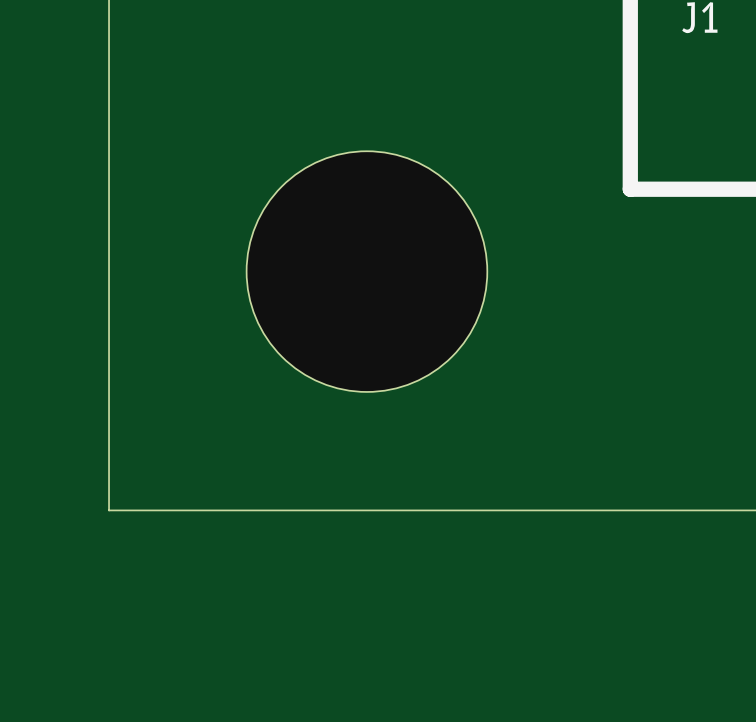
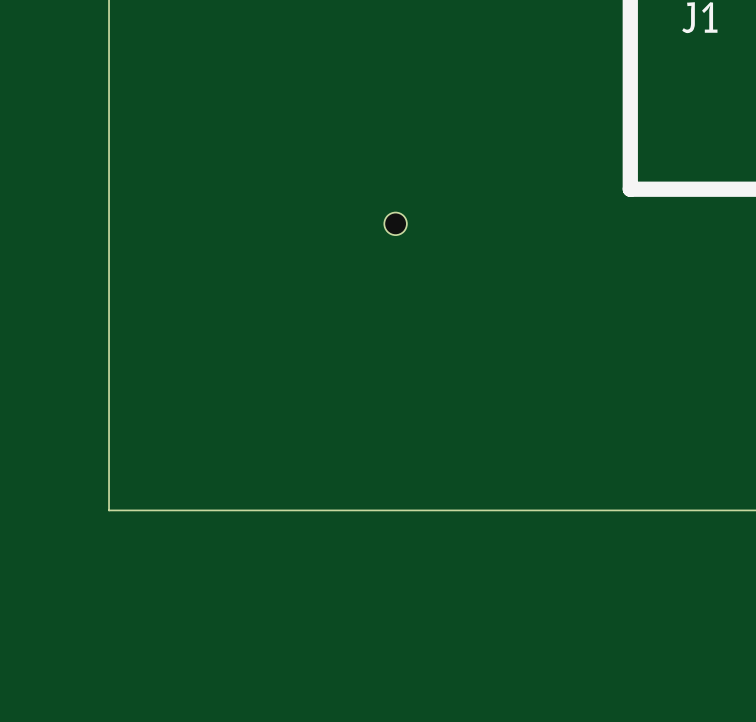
hole size: [246, 151, 488, 392] -> [384, 212, 407, 236]

